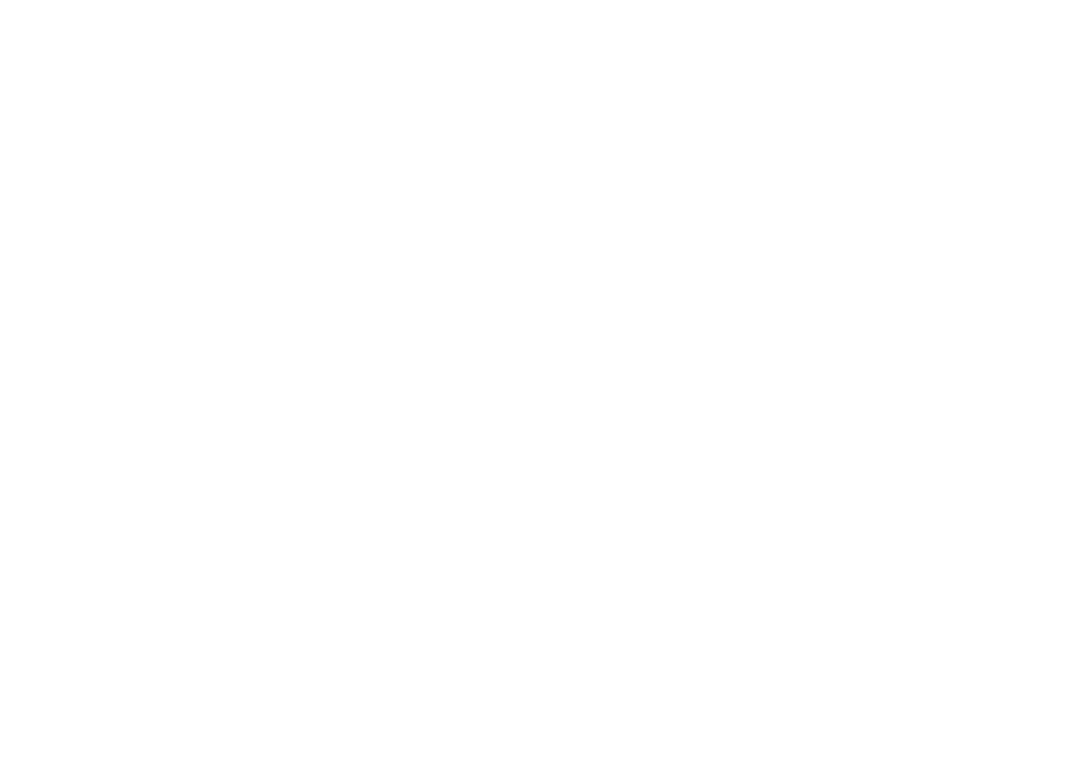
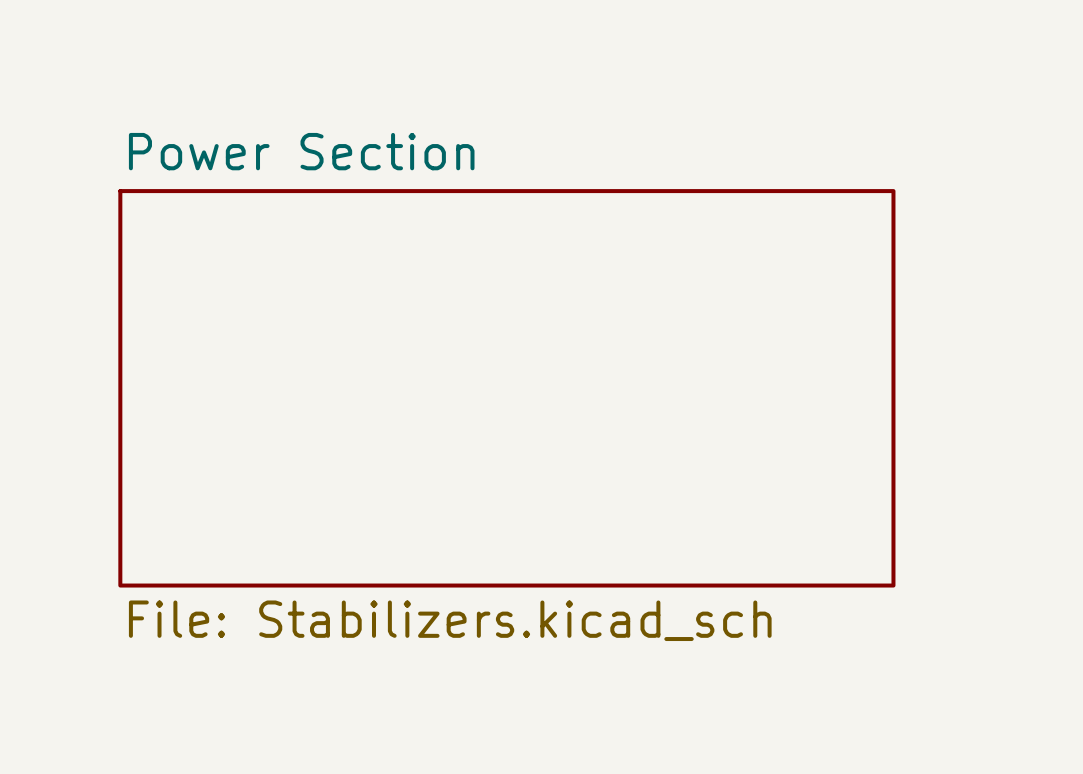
sheet Power Section: none -> File: Stabilizers.kicad_sch (506, 388)

